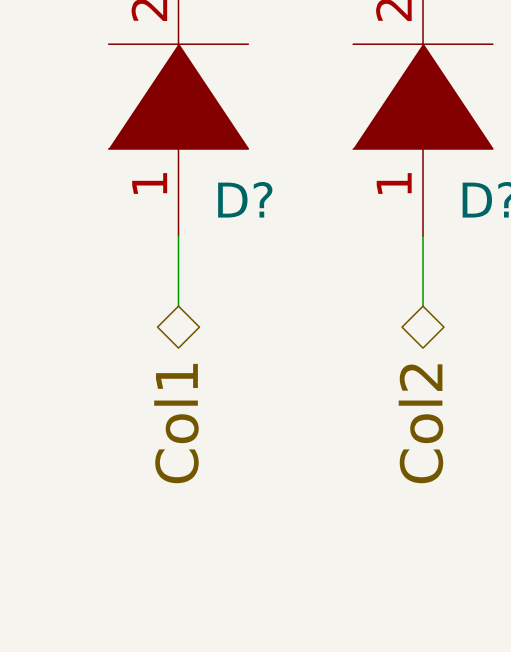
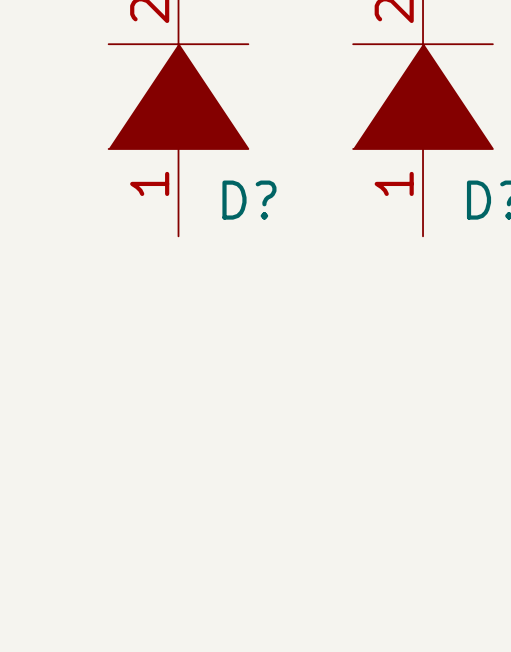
wire: (178, 236) (178, 306) -> none
wire: (423, 236) (423, 306) -> none
hierarchical label: Col1 (176, 423) -> none
hierarchical label: Col2 (420, 423) -> none

